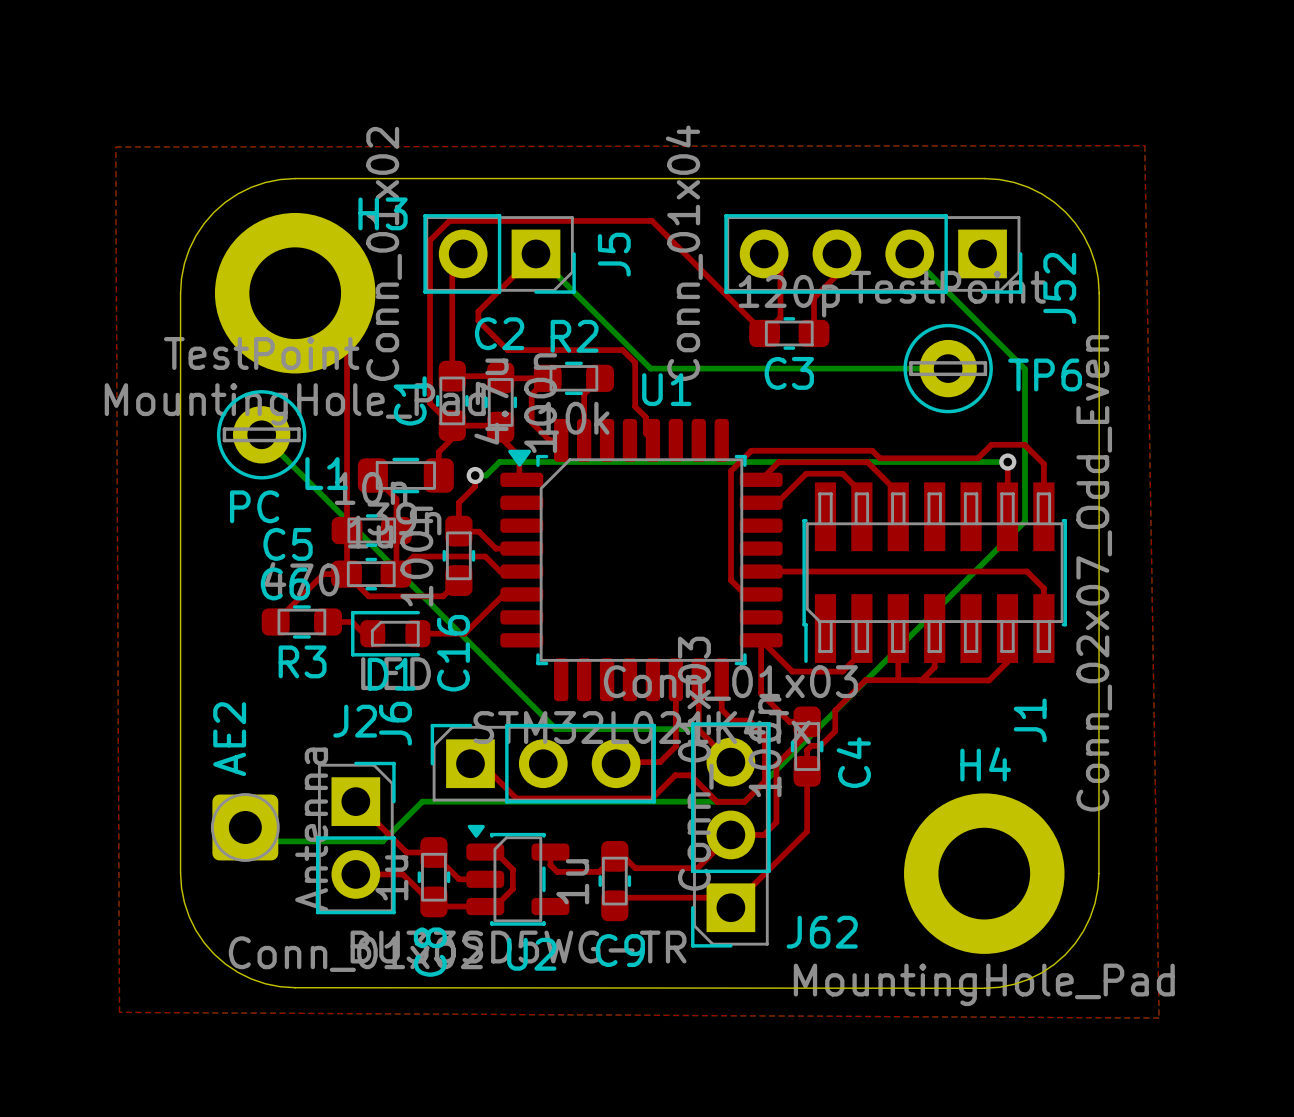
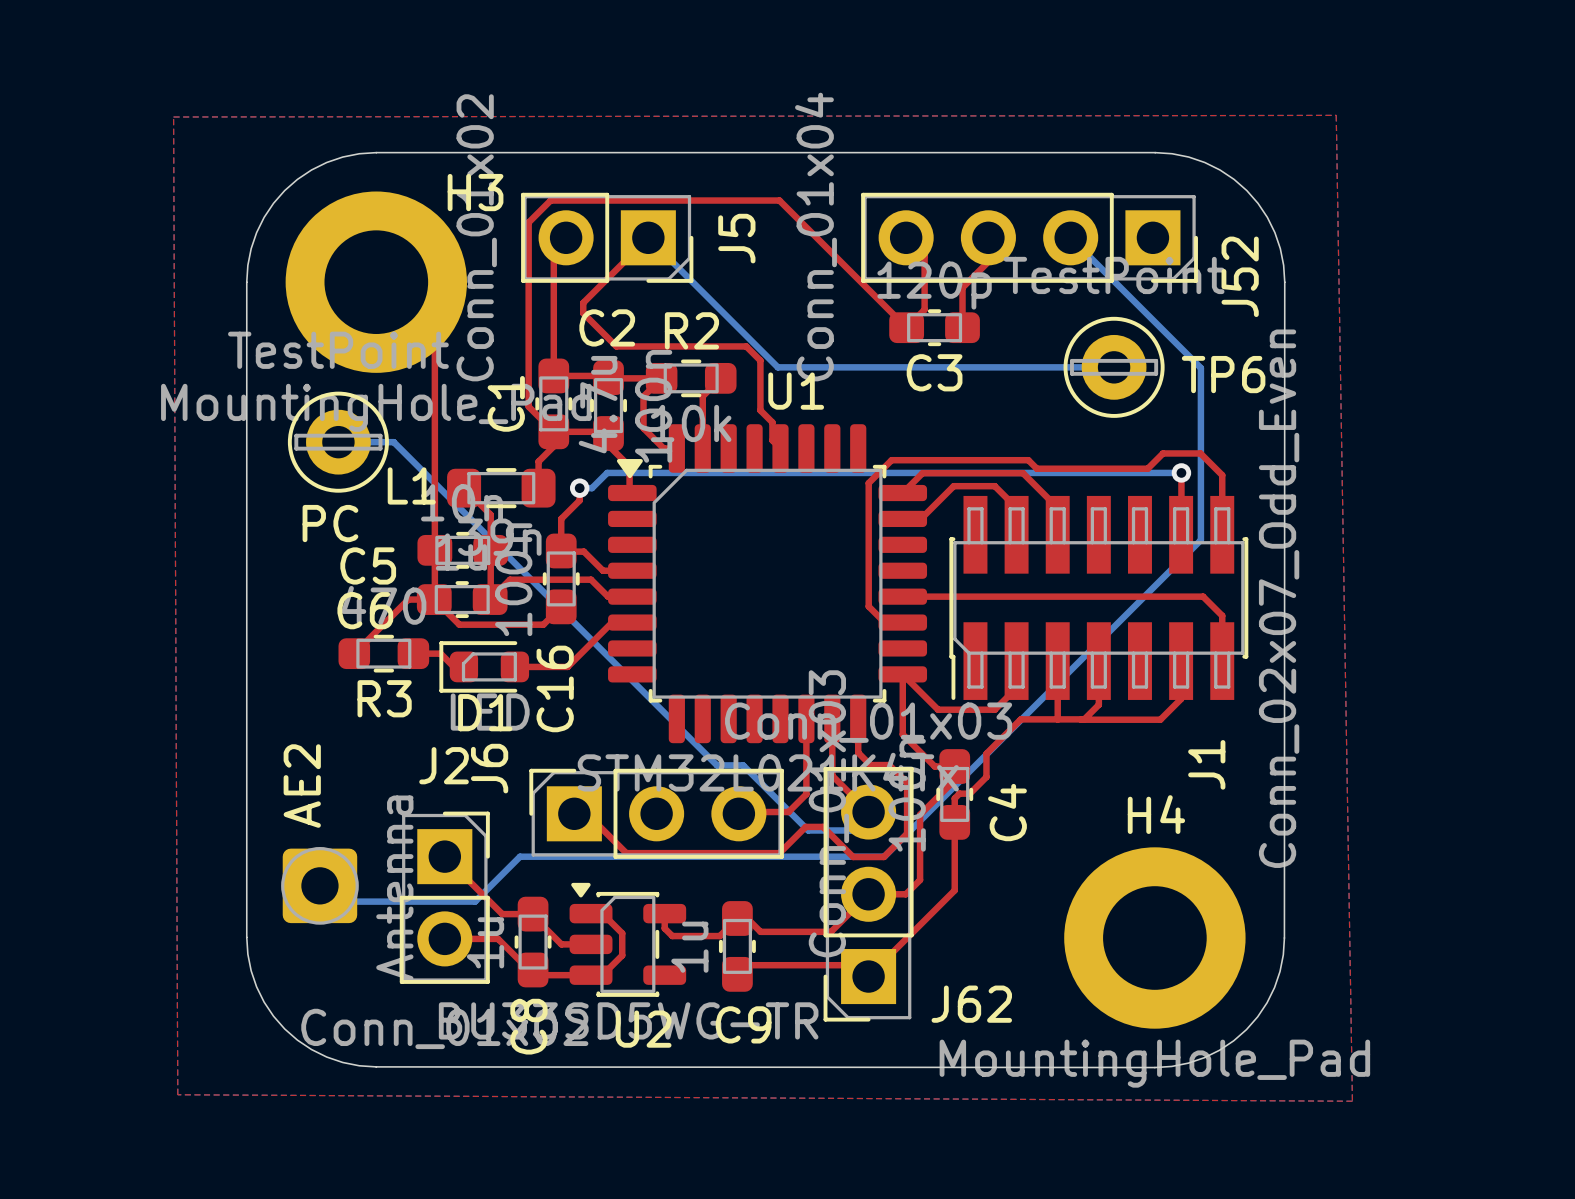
bottom track: (261, 434) (556, 729) (697, 729) (730, 762) -> (338, 442) (393, 442) (717, 765) (743, 765) (808, 830) (850, 830) (868, 812)

